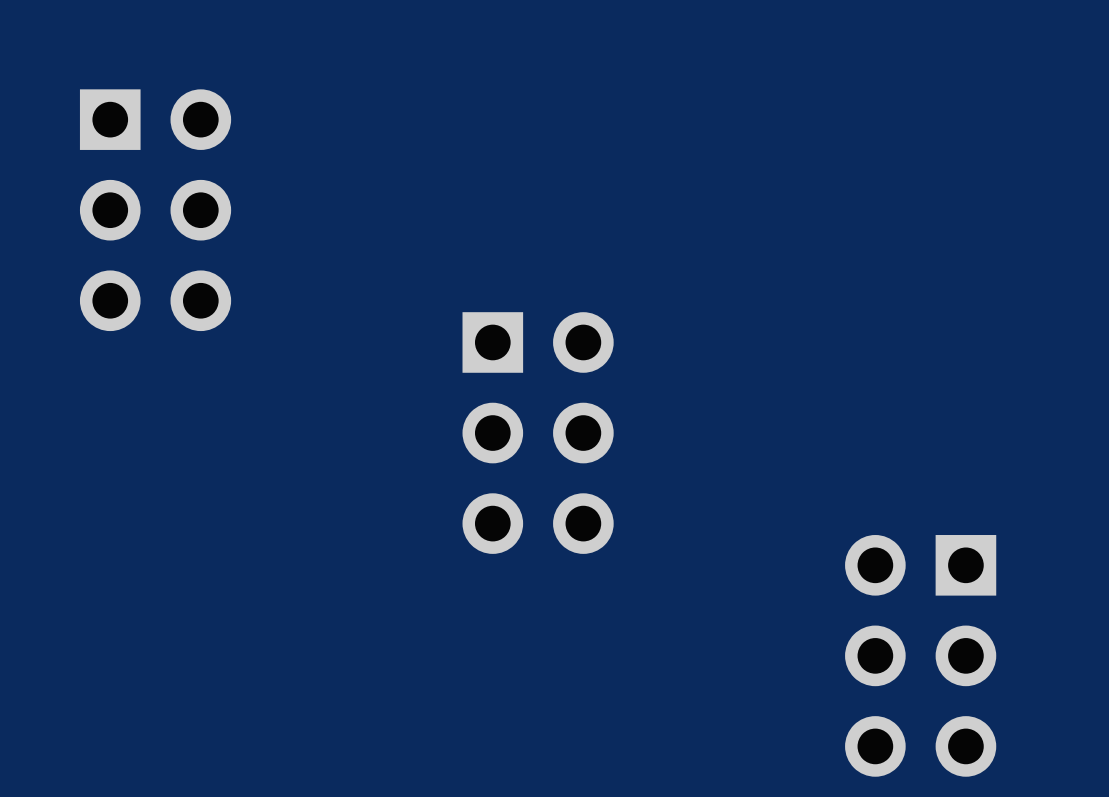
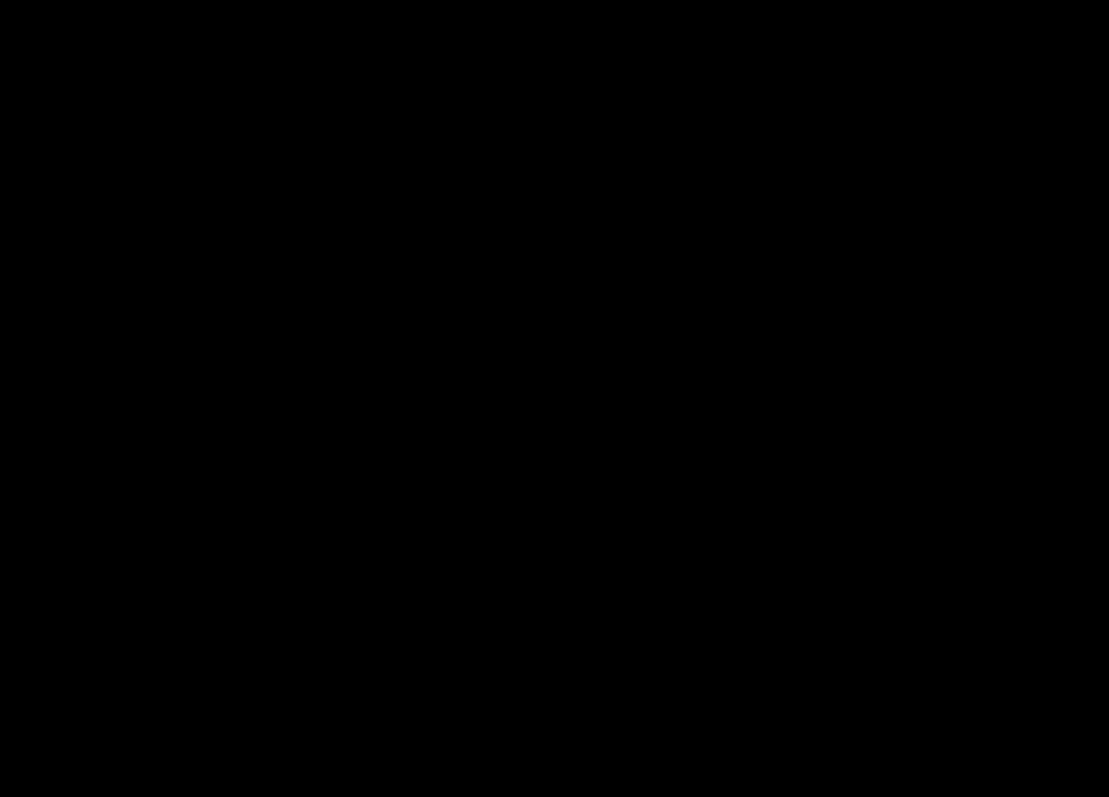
part: (155, 210) -> none
part: (538, 433) -> none
part: (920, 655) -> none

